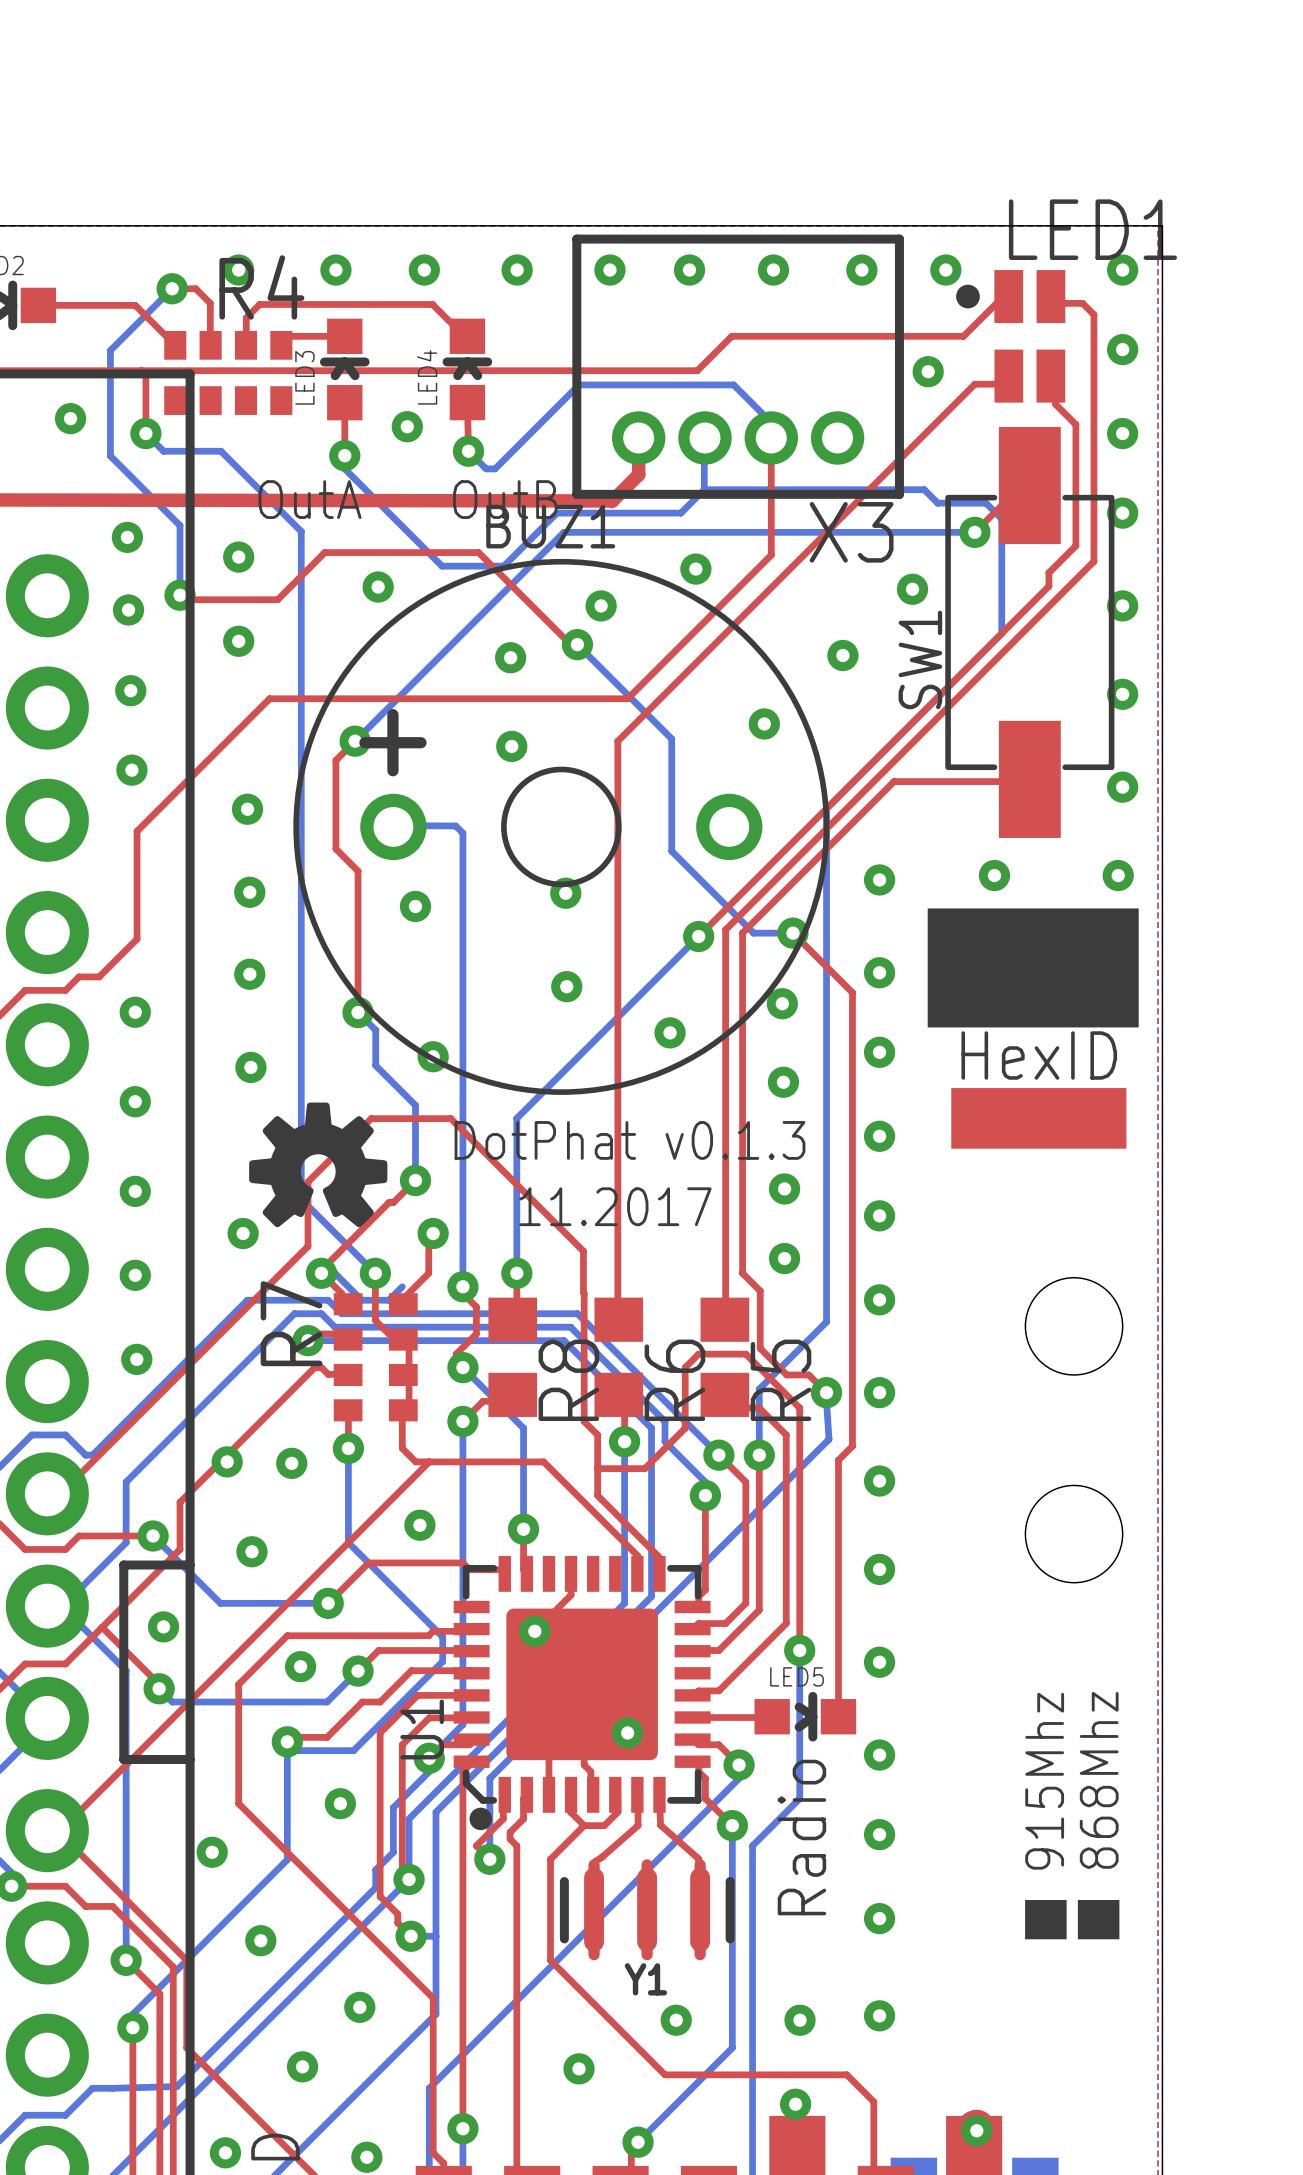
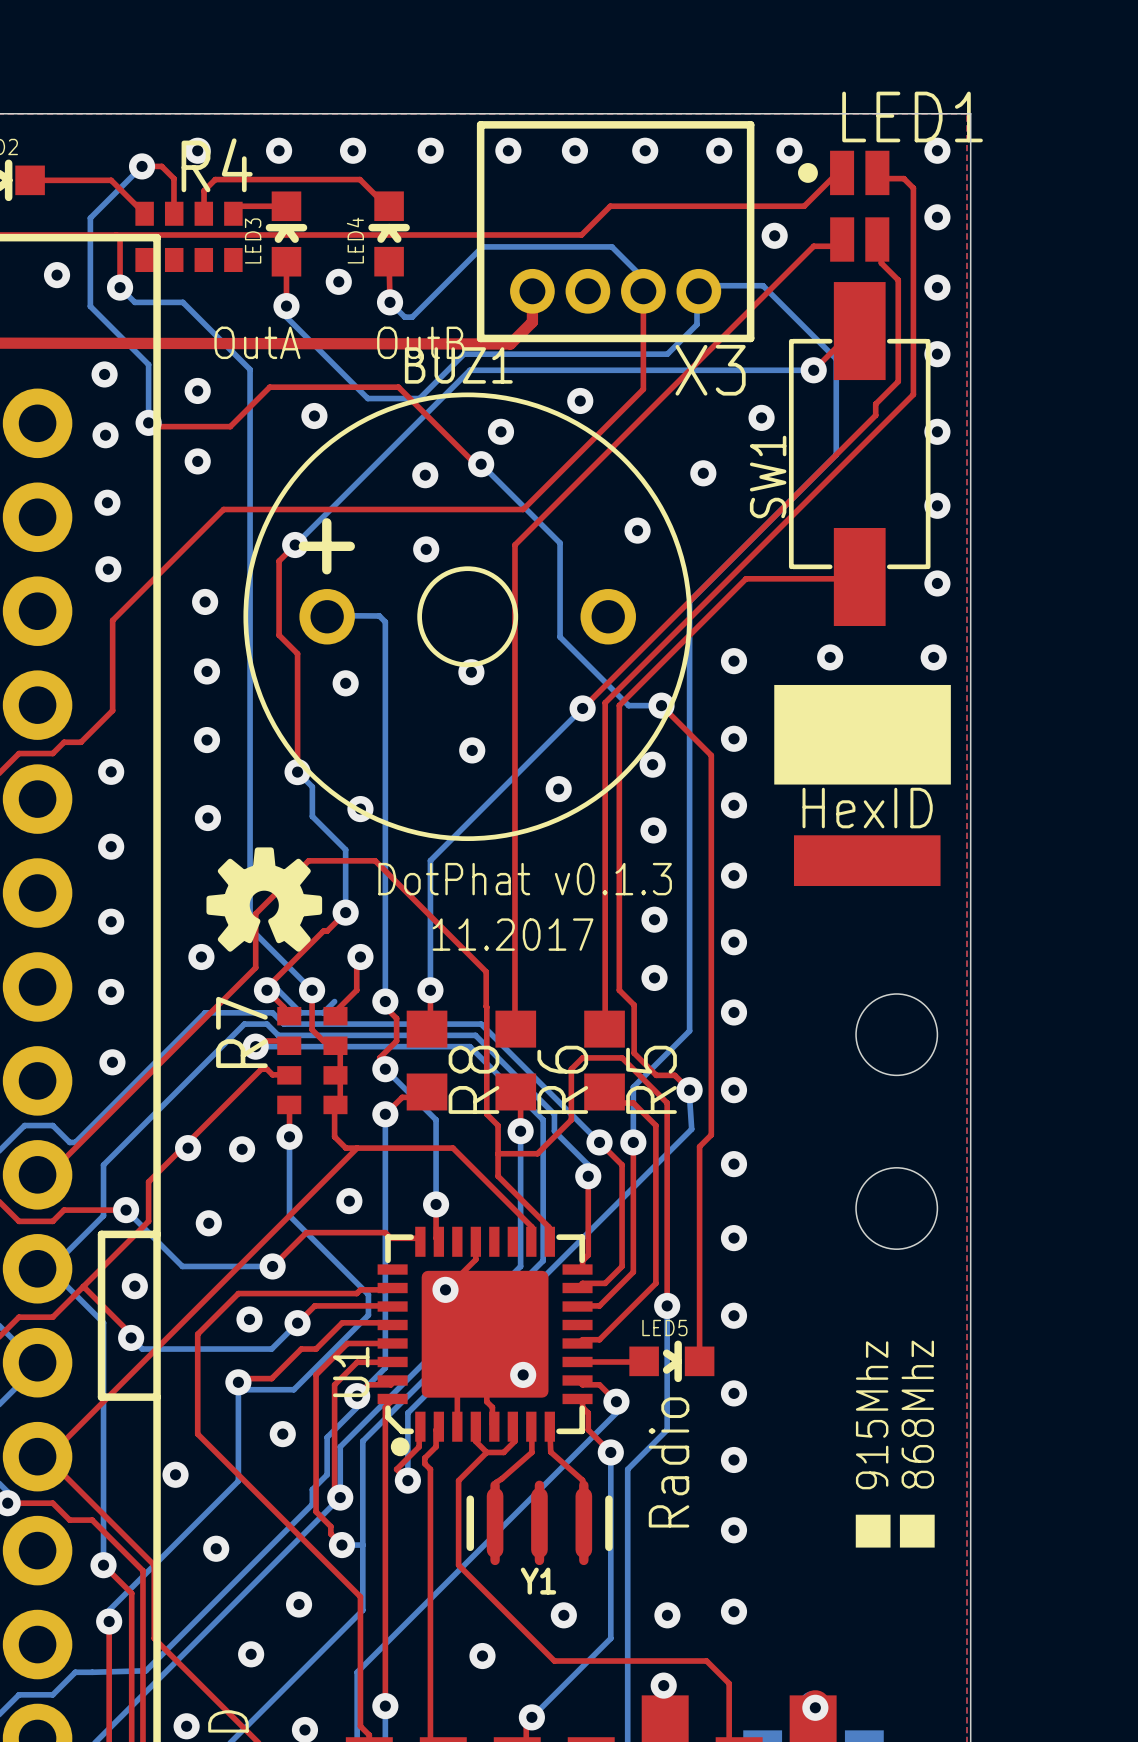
bottom track: (704, 437) (704, 489) -> none
bottom track: (704, 489) (924, 489) (937, 503) (986, 503) -> (567, 354) (667, 354) (697, 324) (697, 293) (704, 285) (762, 285) (823, 345)
bottom track: (704, 489) (680, 513) -> none

